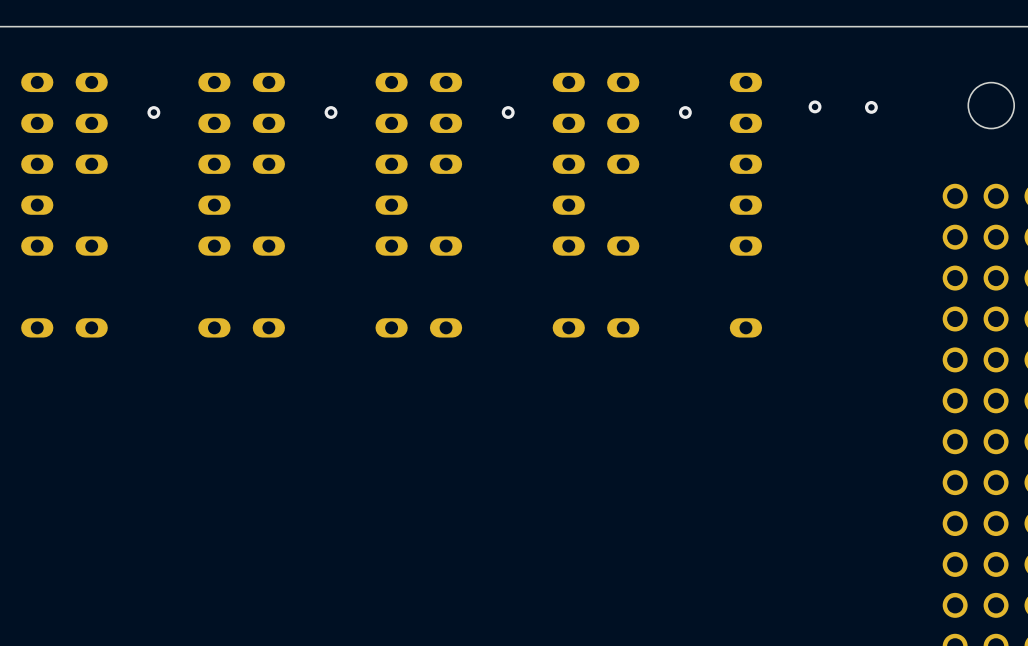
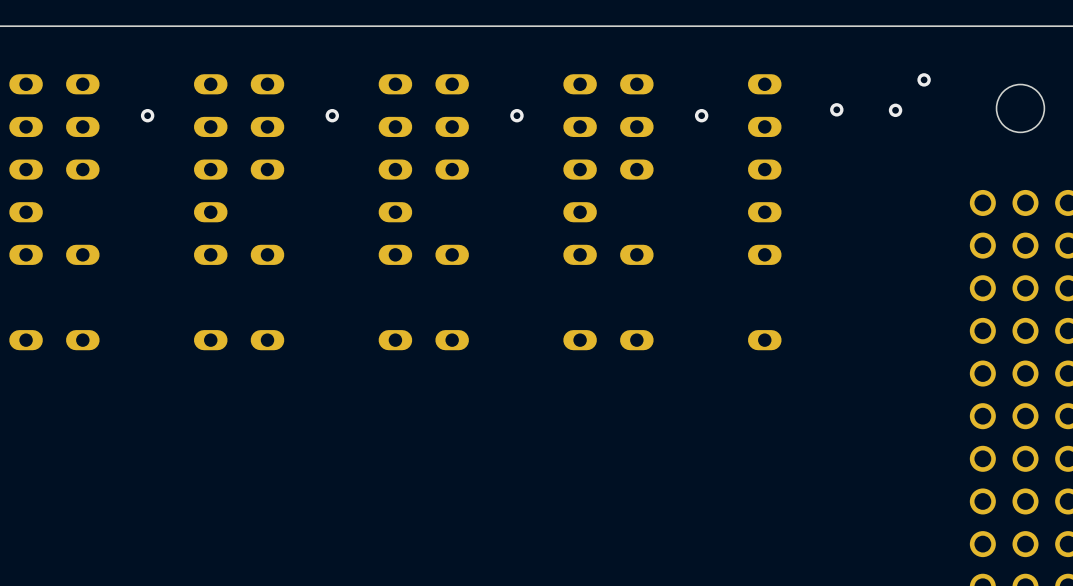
via: none -> (924, 79)

